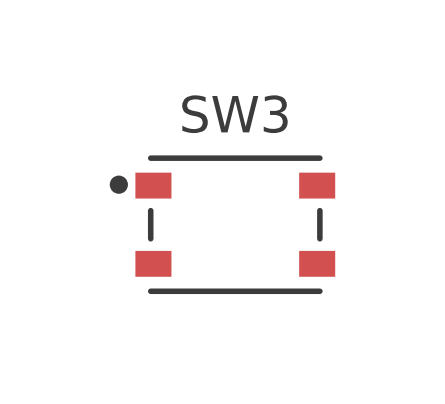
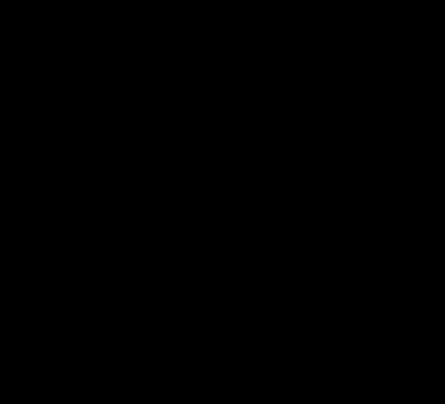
SW3: (222, 224) -> none

